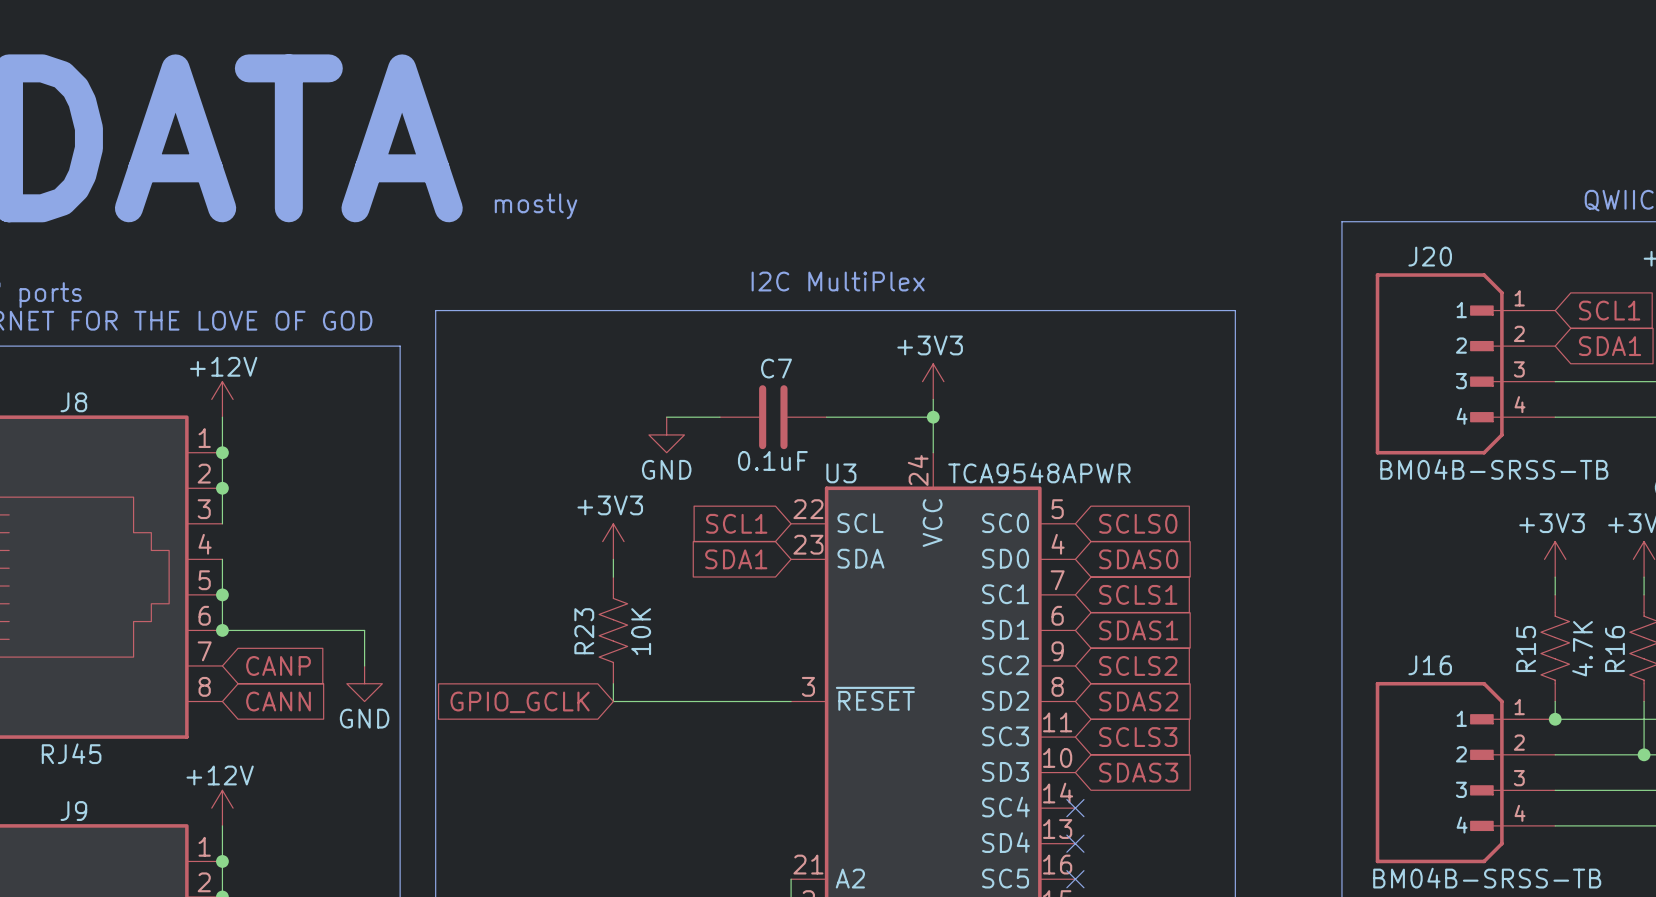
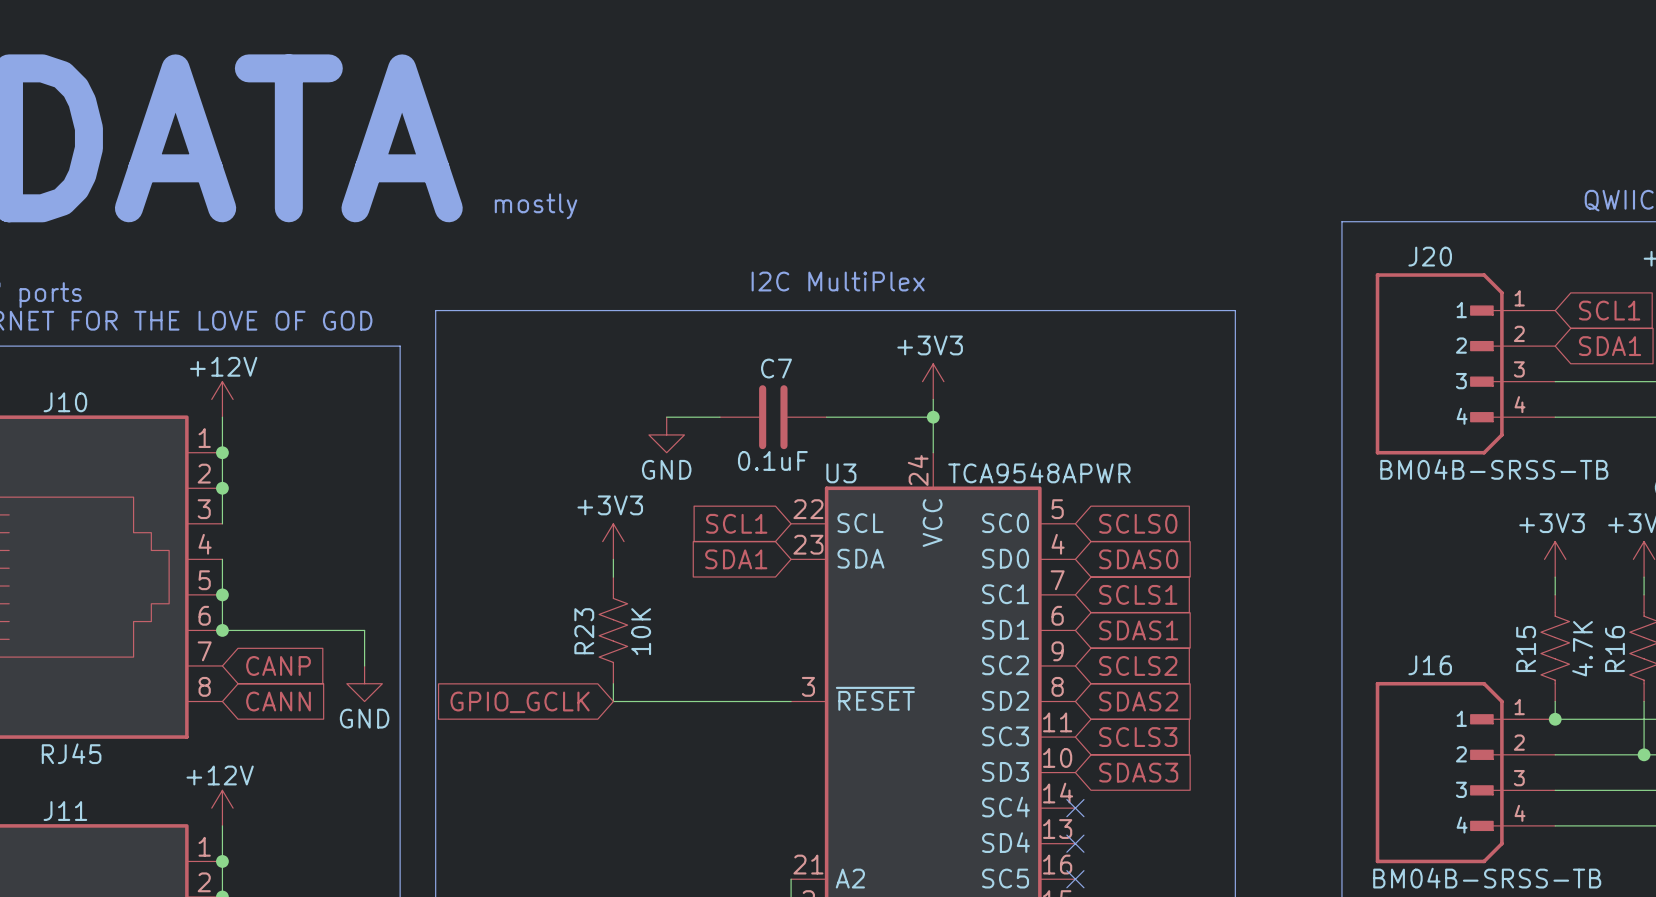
J8 name: J8 (73, 402) -> J10 (65, 402)
J9 name: J9 (73, 811) -> J11 (65, 811)

